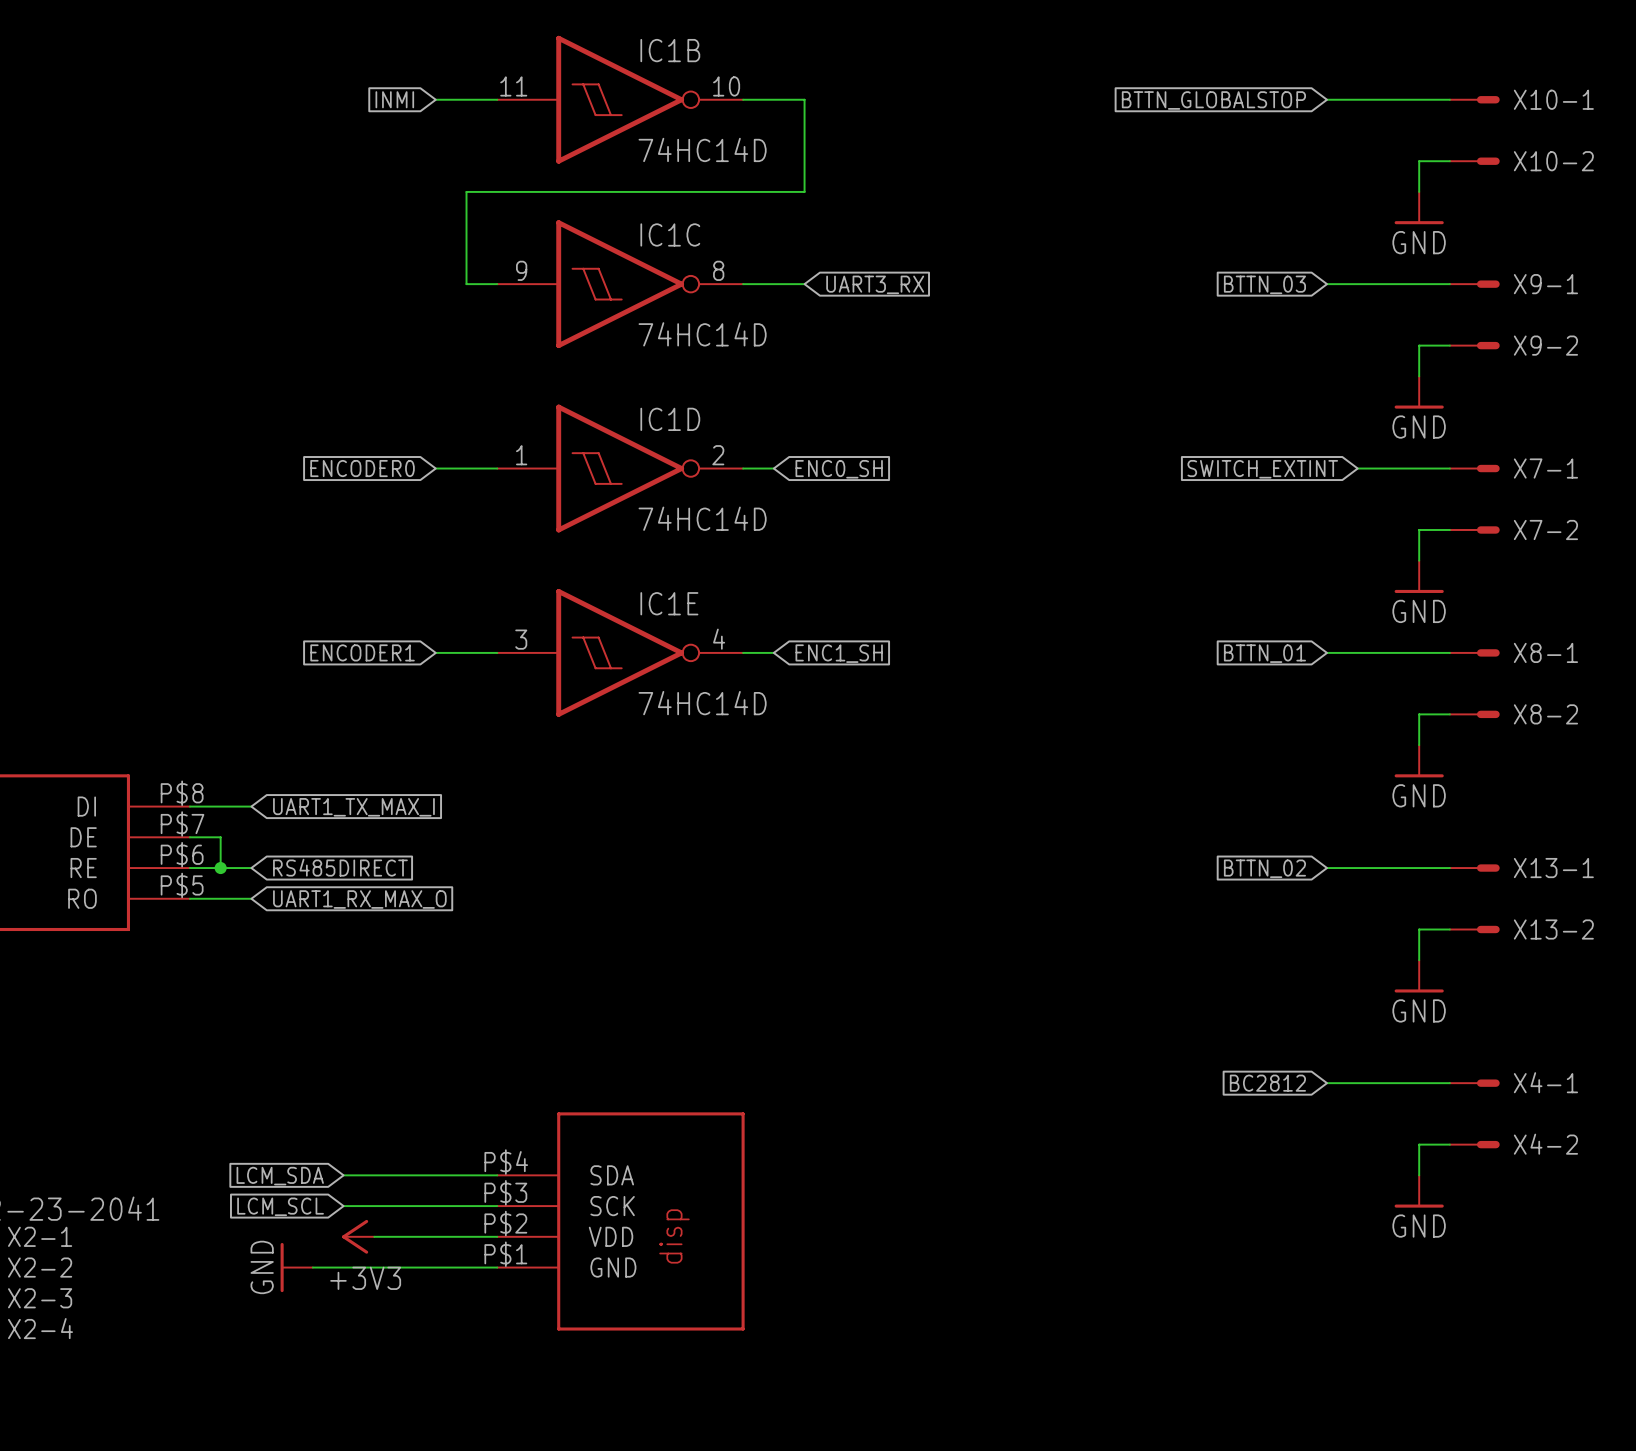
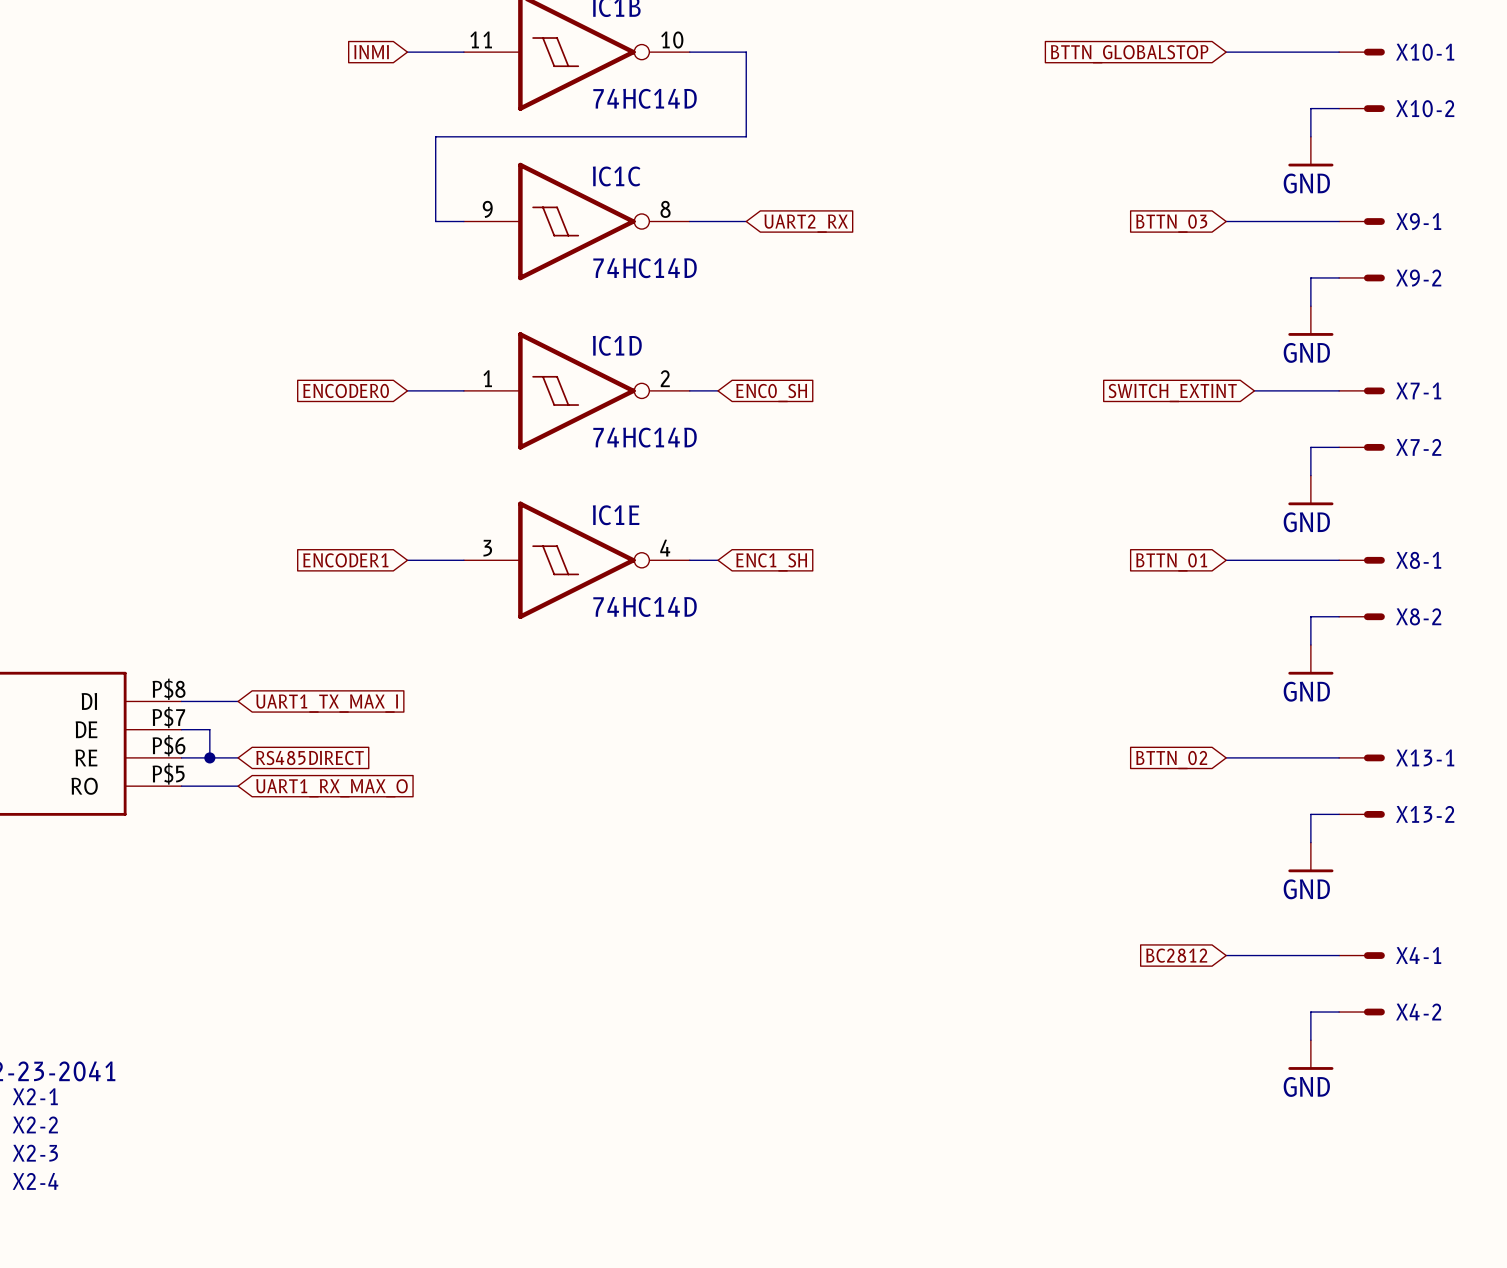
global label: UART3_RX (875, 284) -> UART2_RX (806, 223)
wire: (343, 1175) (497, 1175) -> none
global label: LCM_SDA (280, 1176) -> none
global label: LCM_SCL (280, 1206) -> none
wire: (343, 1206) (497, 1206) -> none
part: (620, 1221) -> none
power symbol: +3V3 (358, 1236) -> none
wire: (374, 1236) (497, 1236) -> none
power symbol: GND (296, 1267) -> none
wire: (312, 1267) (497, 1267) -> none

